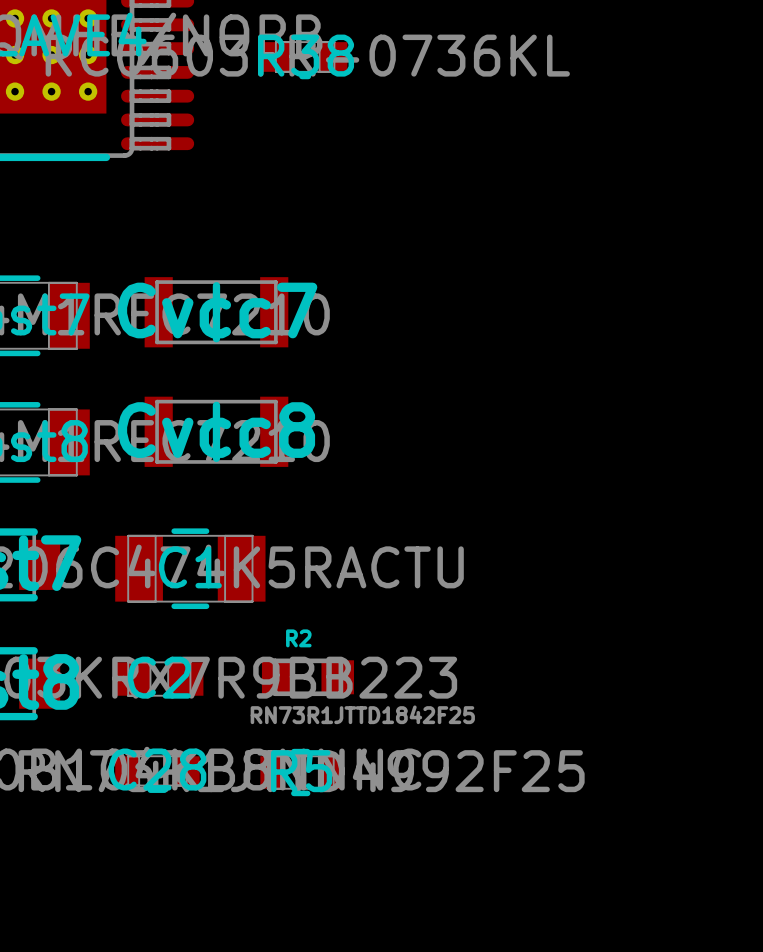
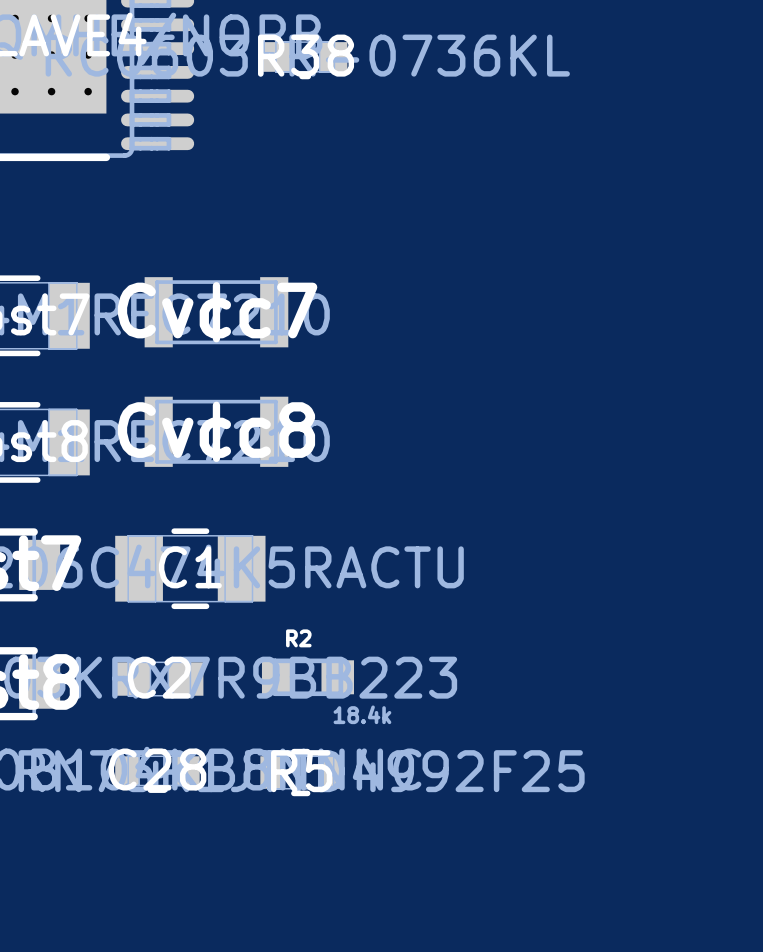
R2 value: RN73R1JTTD1842F25 (362, 714) -> 18.4k (362, 714)

